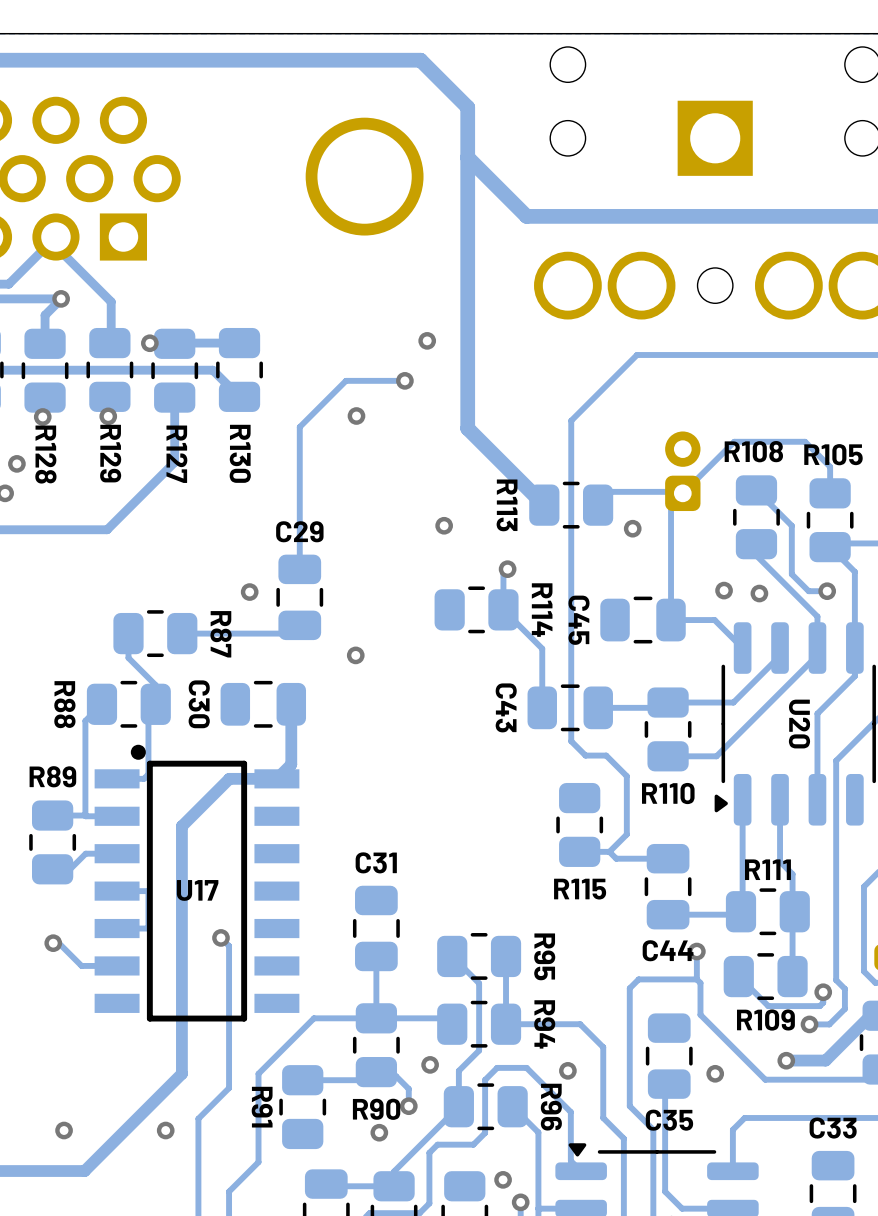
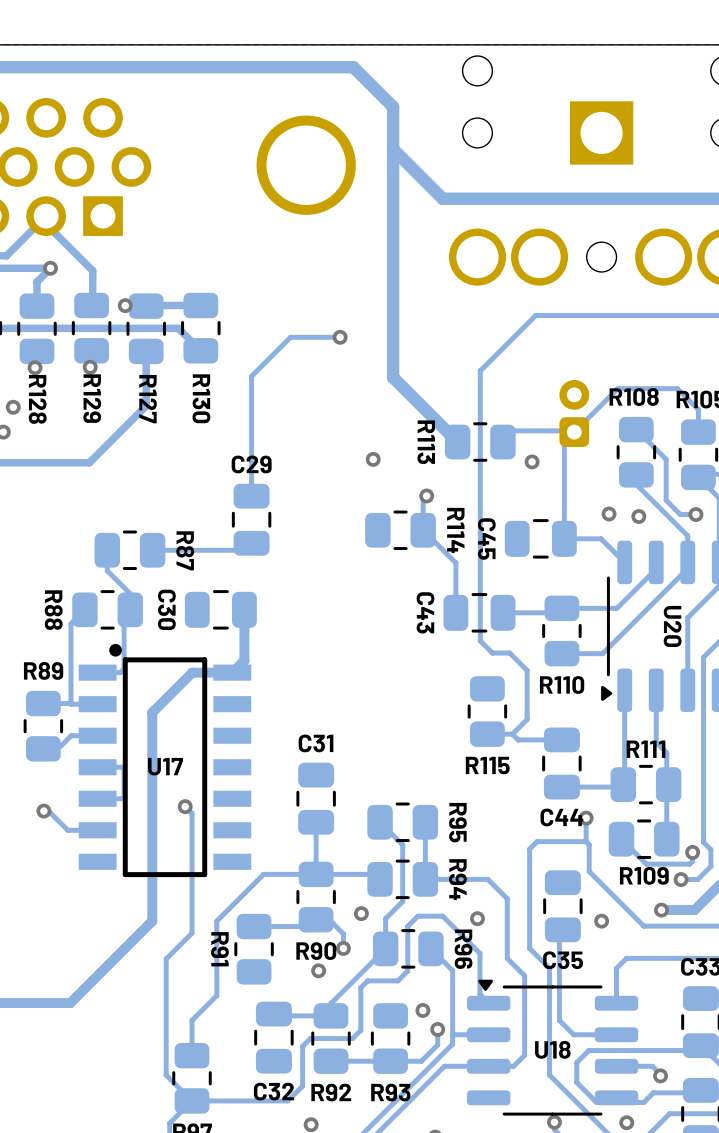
via: (427, 340) -> none
via: (356, 416) -> none
via: (249, 592) -> none
via: (355, 655) -> none
via: (64, 1130) -> none
via: (165, 1130) -> none

